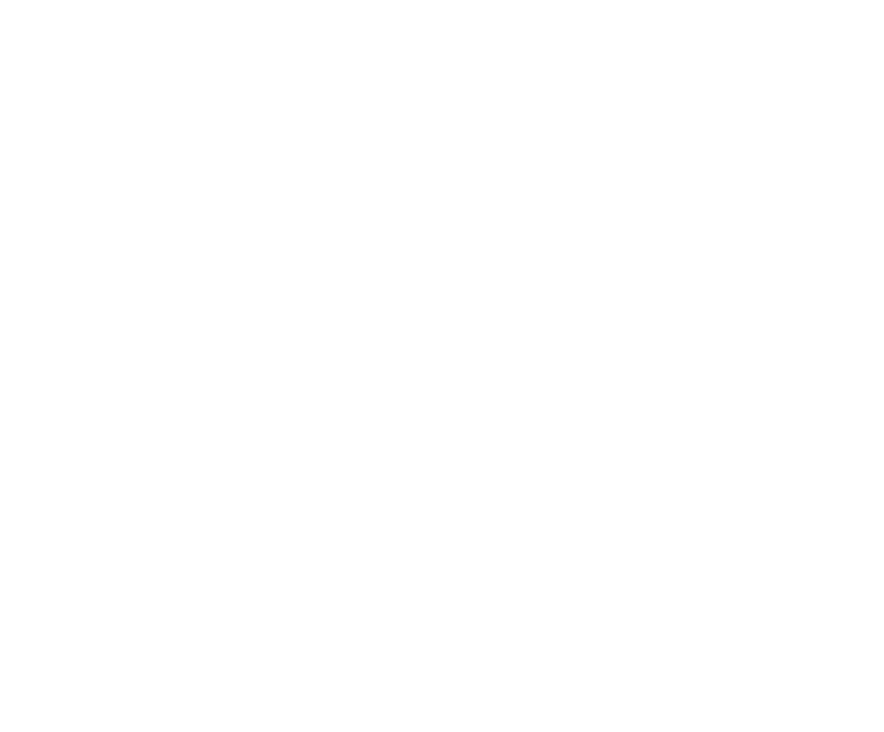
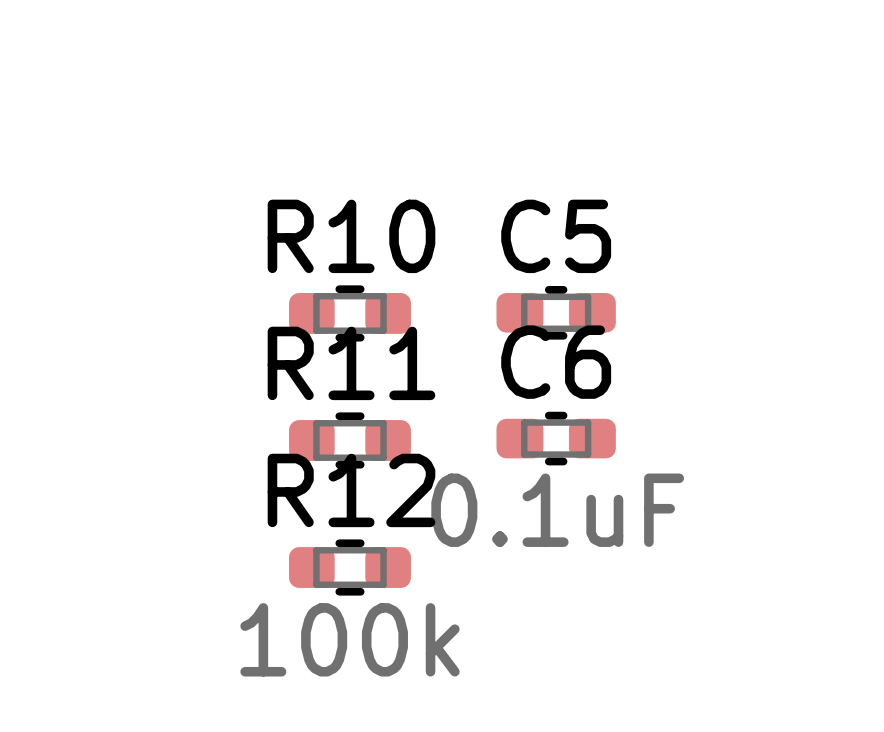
C5: none -> (556, 312)
R10: none -> (349, 313)
C6: none -> 0.1uF (556, 438)
R11: none -> (349, 440)
R12: none -> 100k (349, 567)

